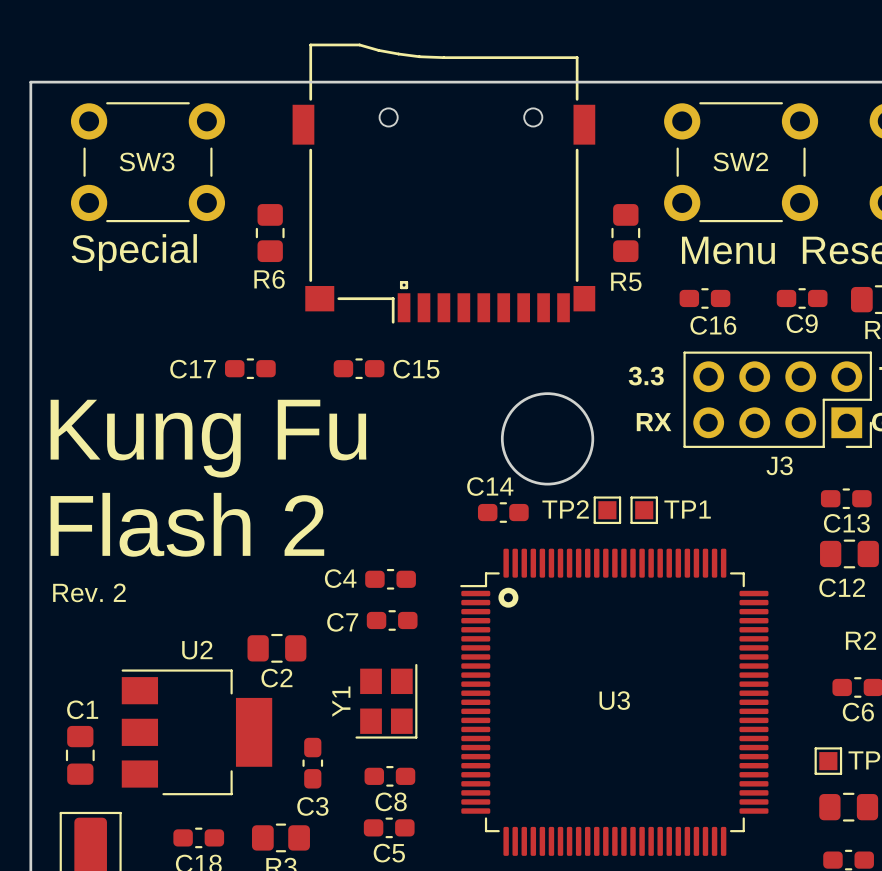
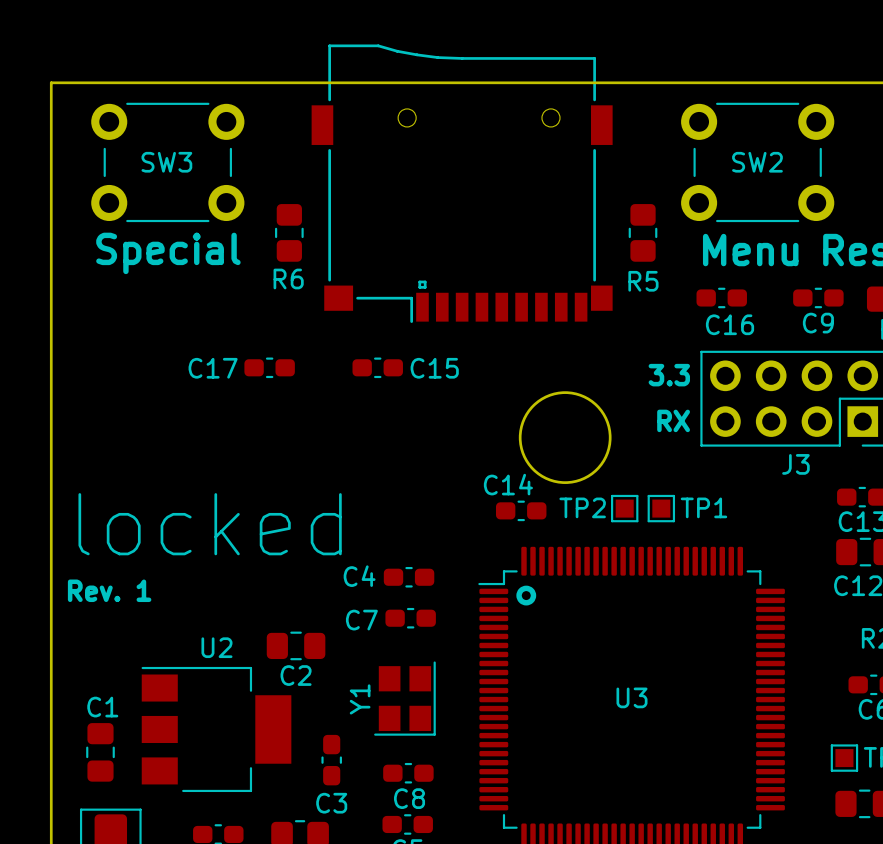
text: Kung Fu (208, 438) -> none
text: Flash 2 (187, 524) -> locked (210, 524)
text: Rev. 2 (89, 592) -> Rev. 1 (109, 590)

